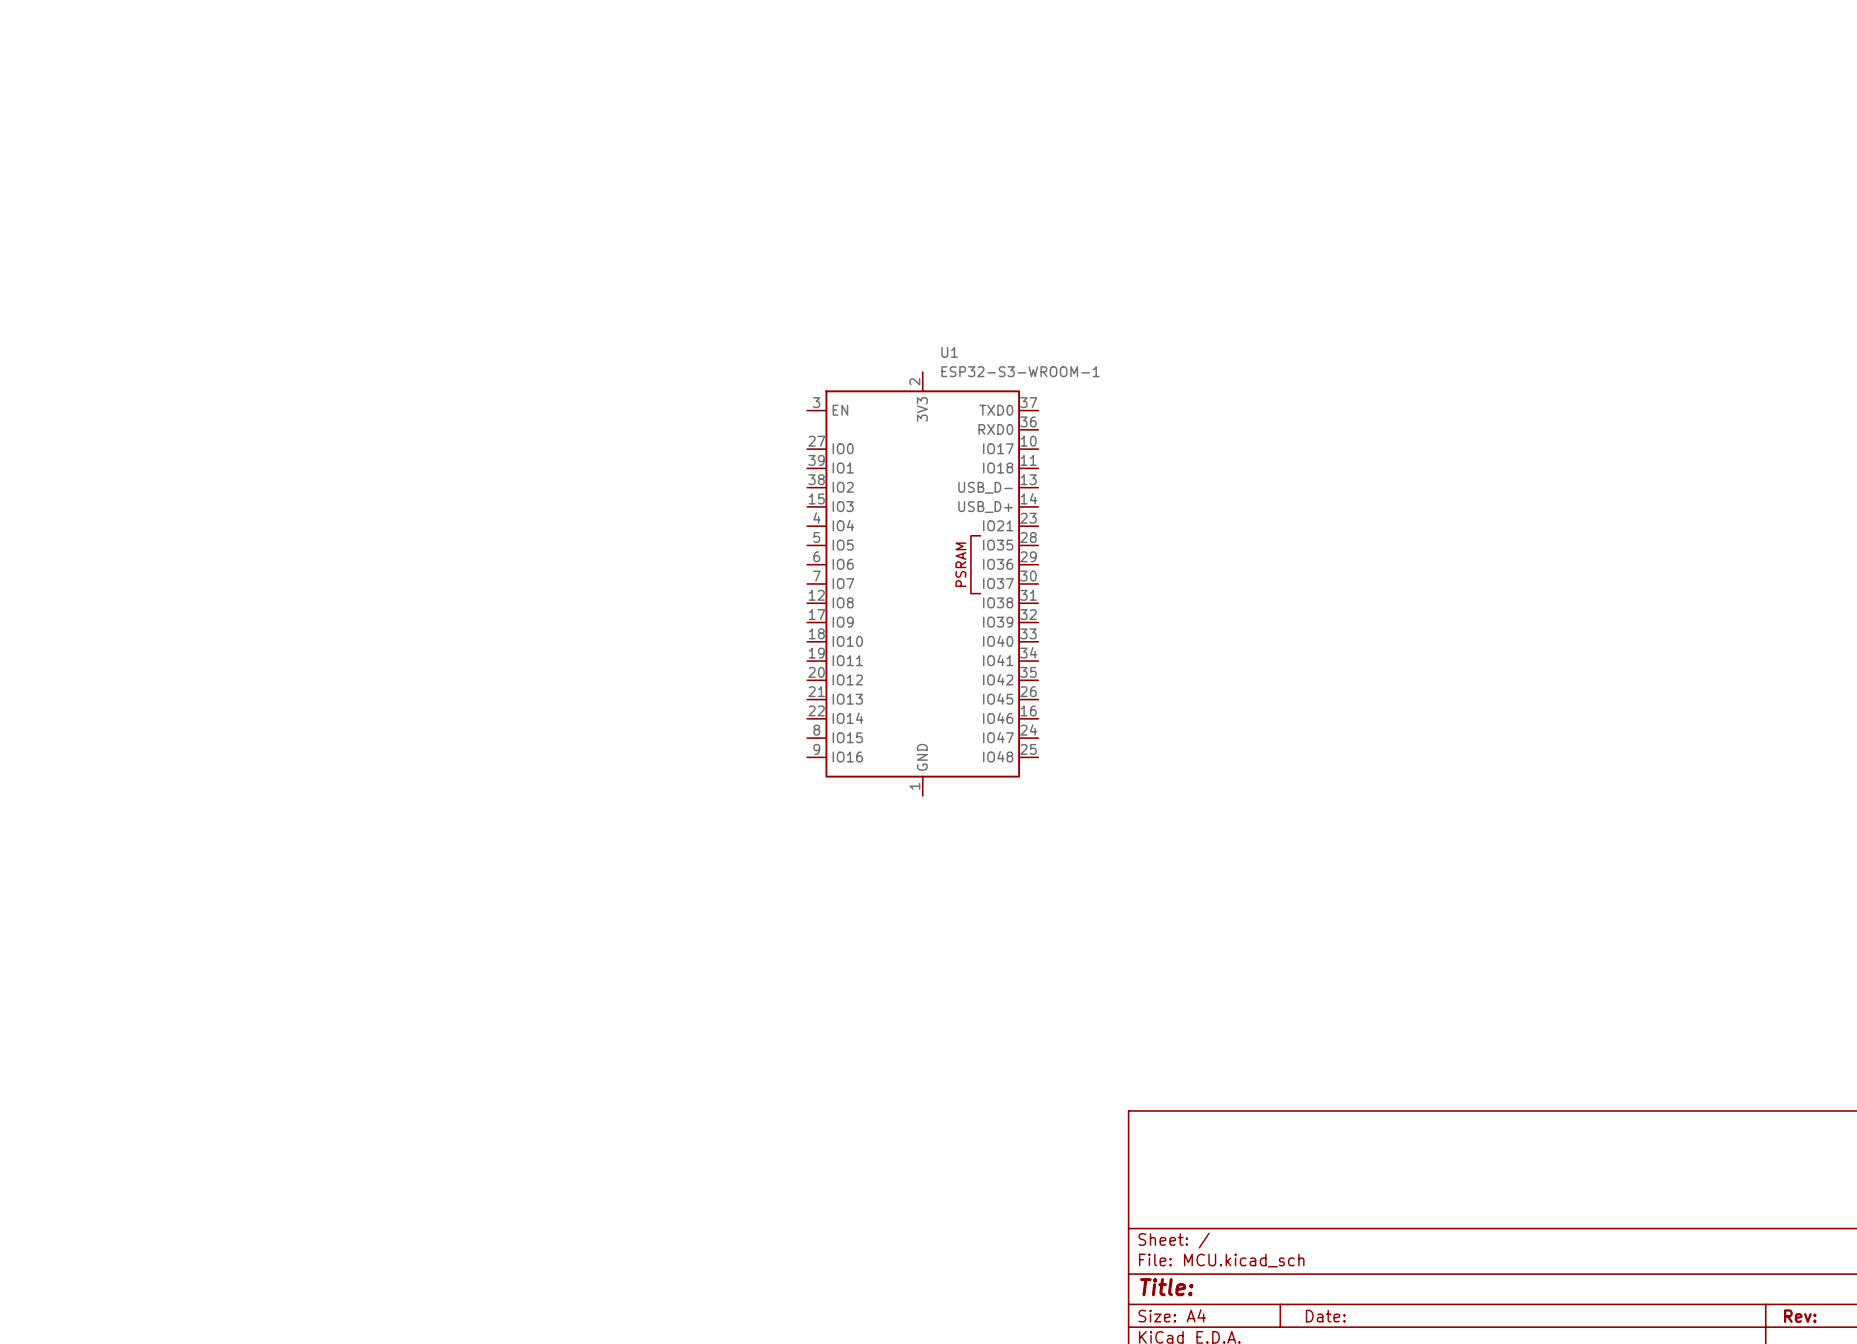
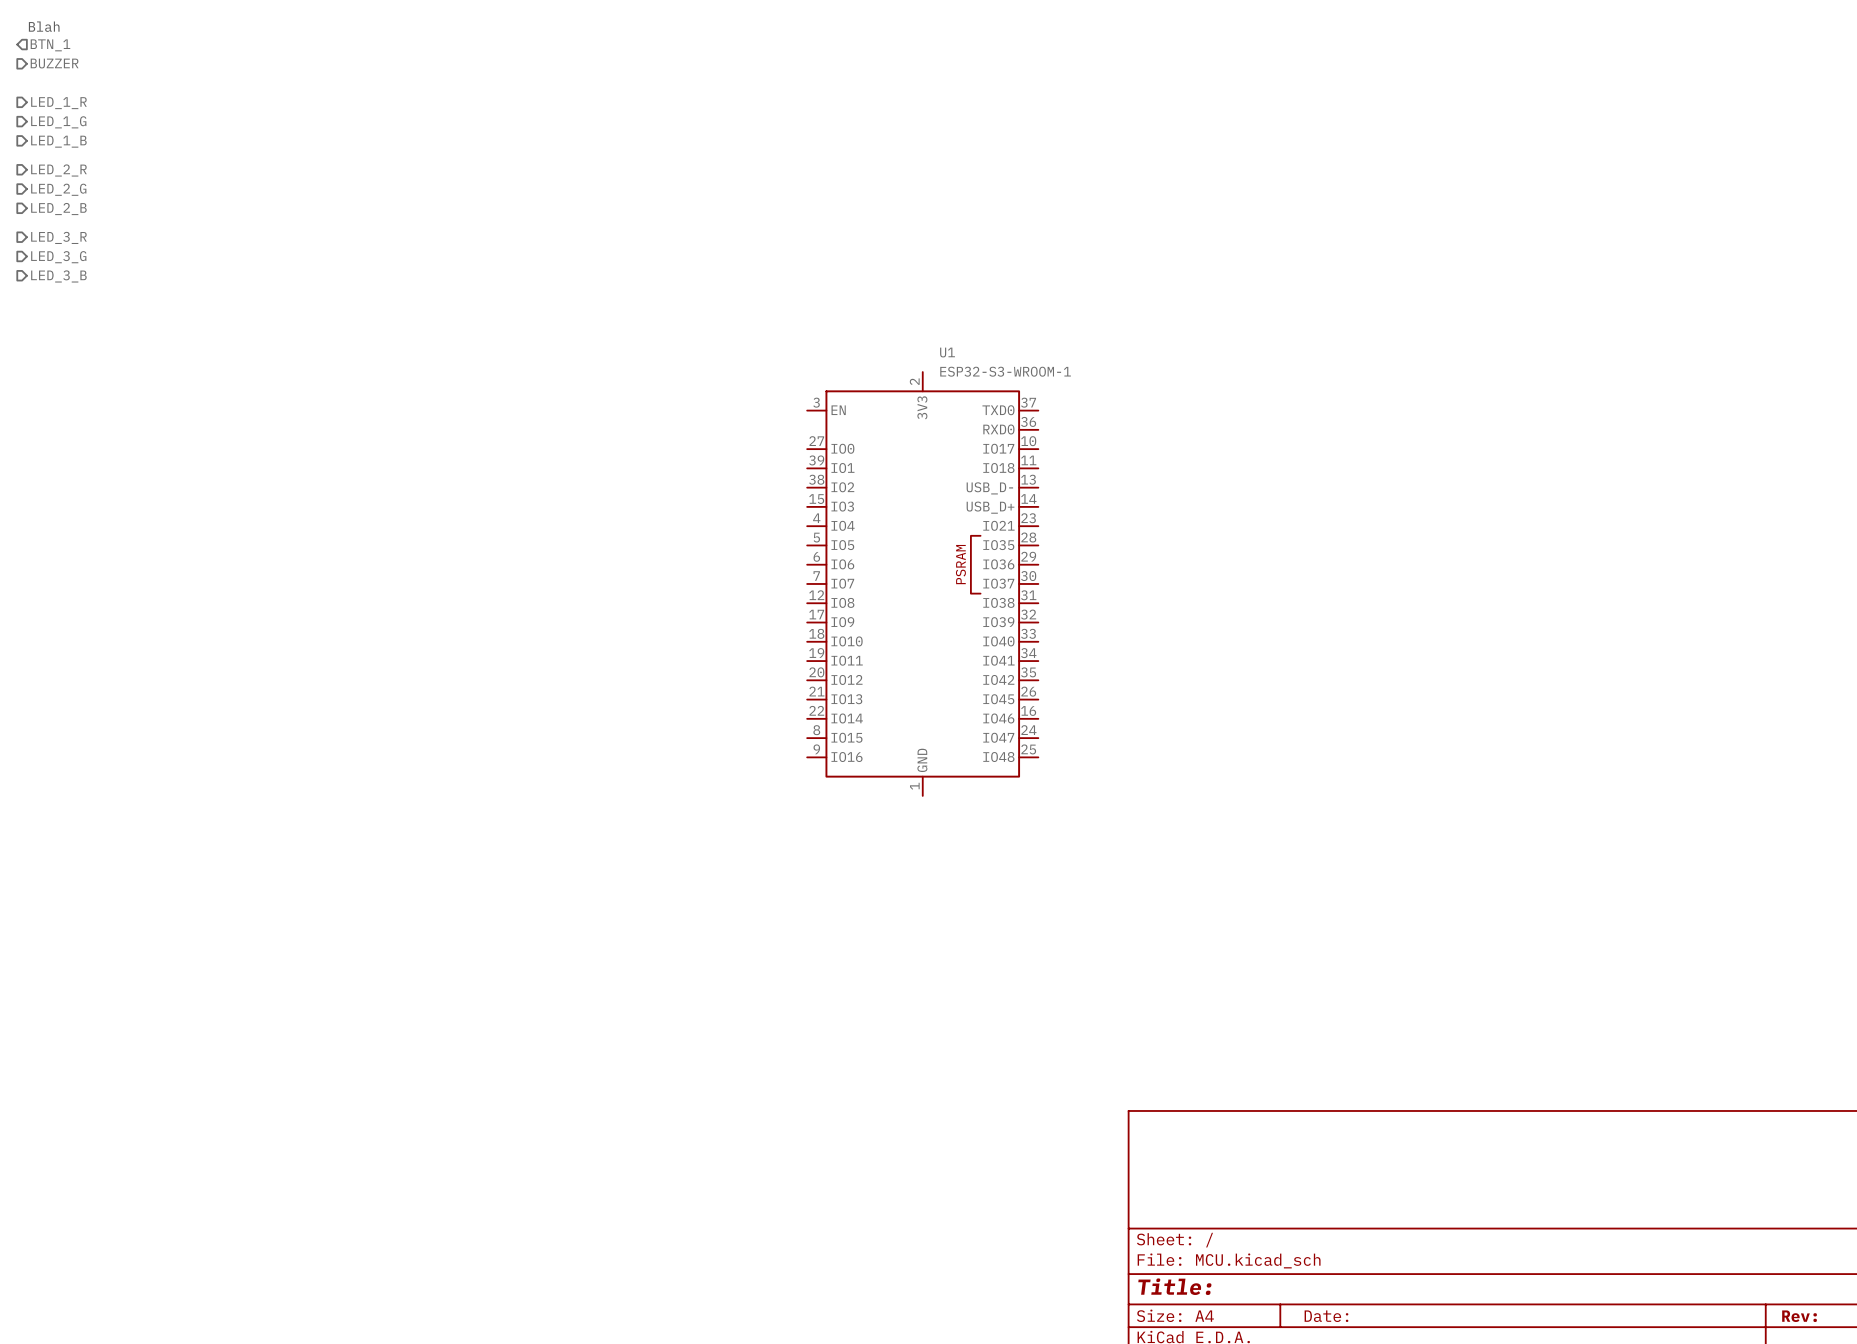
text: none -> Blah (44, 26)
hierarchical label: none -> BTN_1 (50, 45)
hierarchical label: none -> BUZZER (54, 63)
hierarchical label: none -> LED_1_R (58, 103)
hierarchical label: none -> LED_1_G (58, 122)
hierarchical label: none -> LED_1_B (58, 141)
hierarchical label: none -> LED_2_R (58, 170)
hierarchical label: none -> LED_2_G (58, 189)
hierarchical label: none -> LED_2_B (58, 209)
hierarchical label: none -> LED_3_R (58, 237)
hierarchical label: none -> LED_3_G (58, 257)
hierarchical label: none -> LED_3_B (58, 276)

